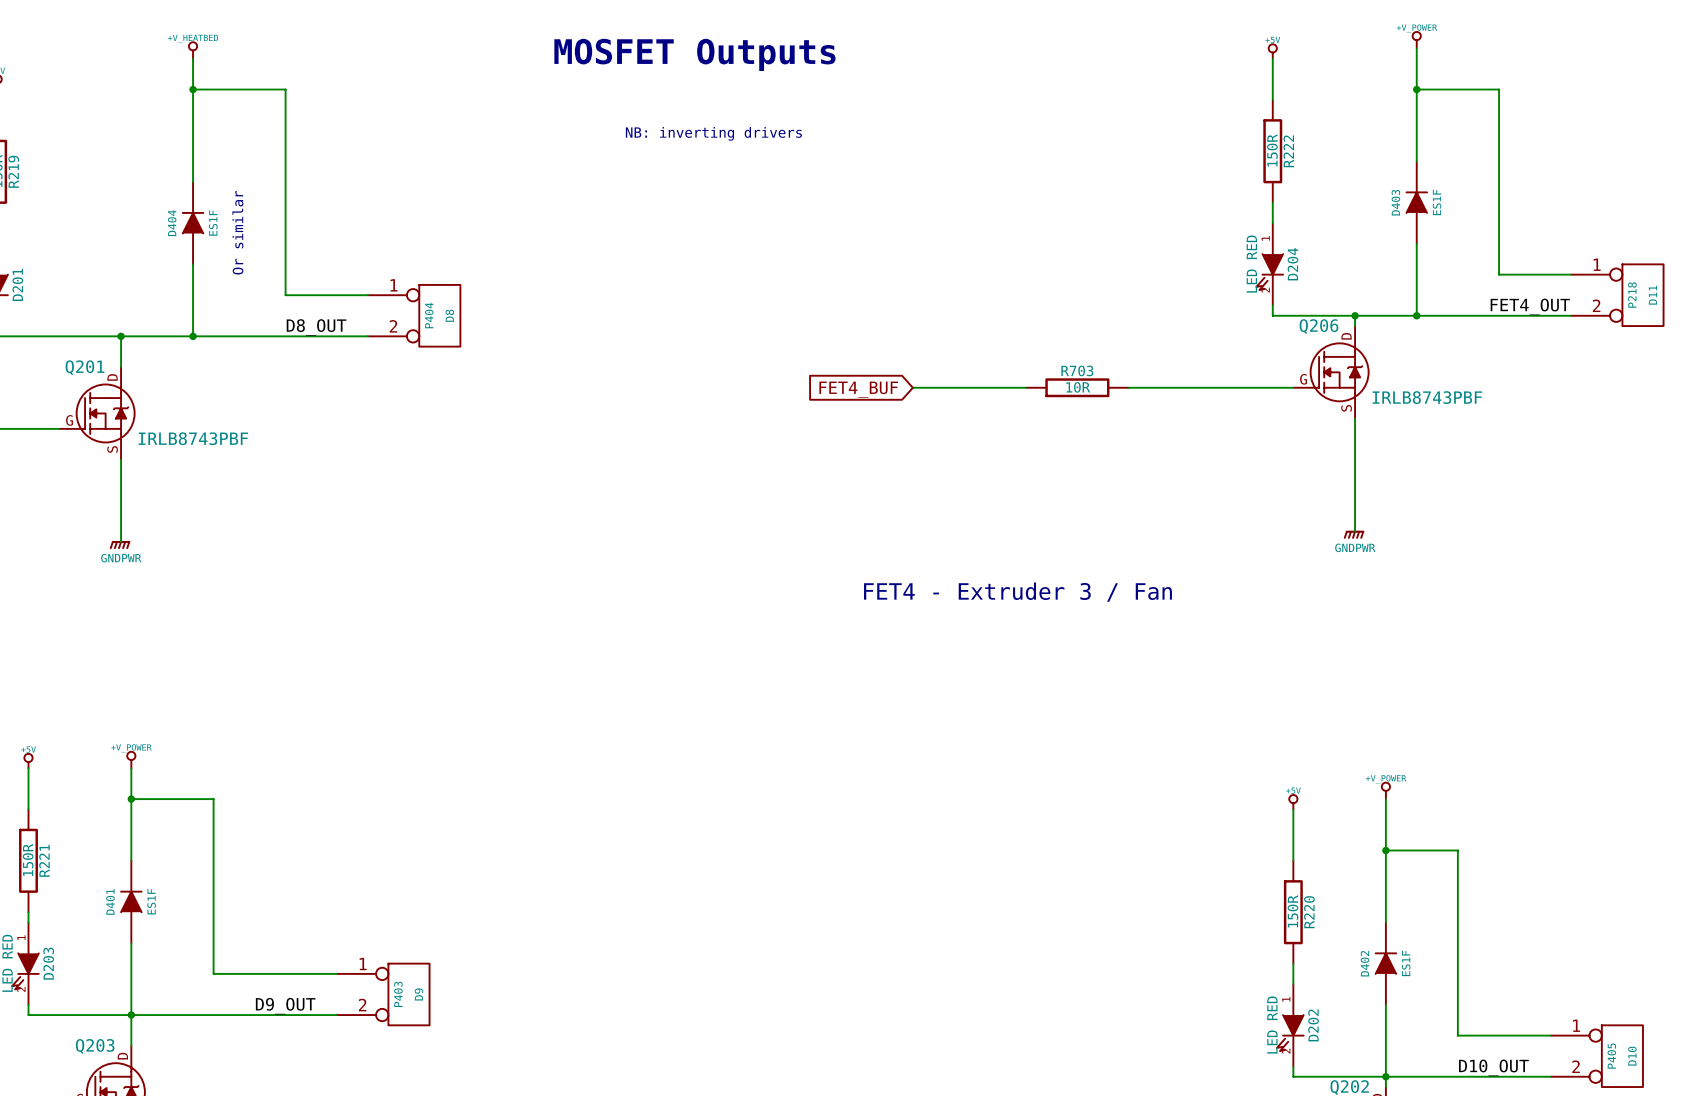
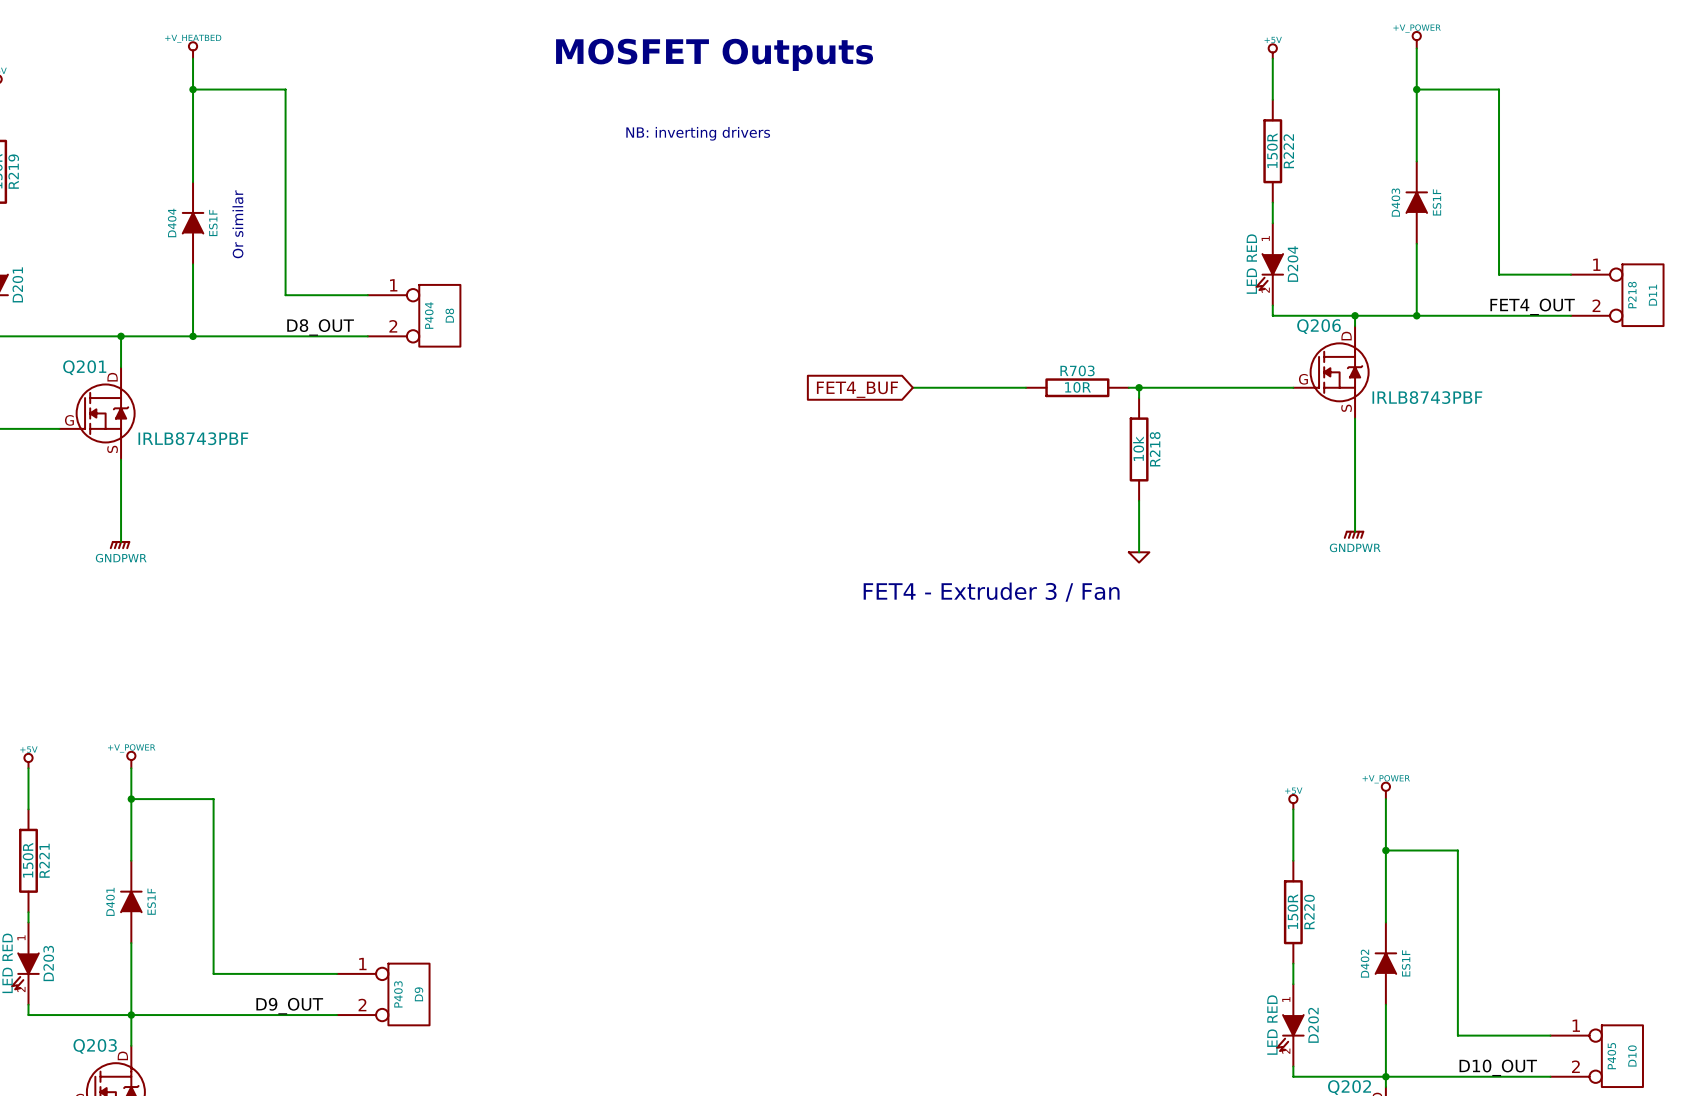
wire: none -> (1139, 387) (1139, 398)
junction: none -> (1139, 387)
R218: none -> 10k (1139, 449)
wire: none -> (1139, 500) (1139, 552)
power symbol: none -> (1139, 557)

